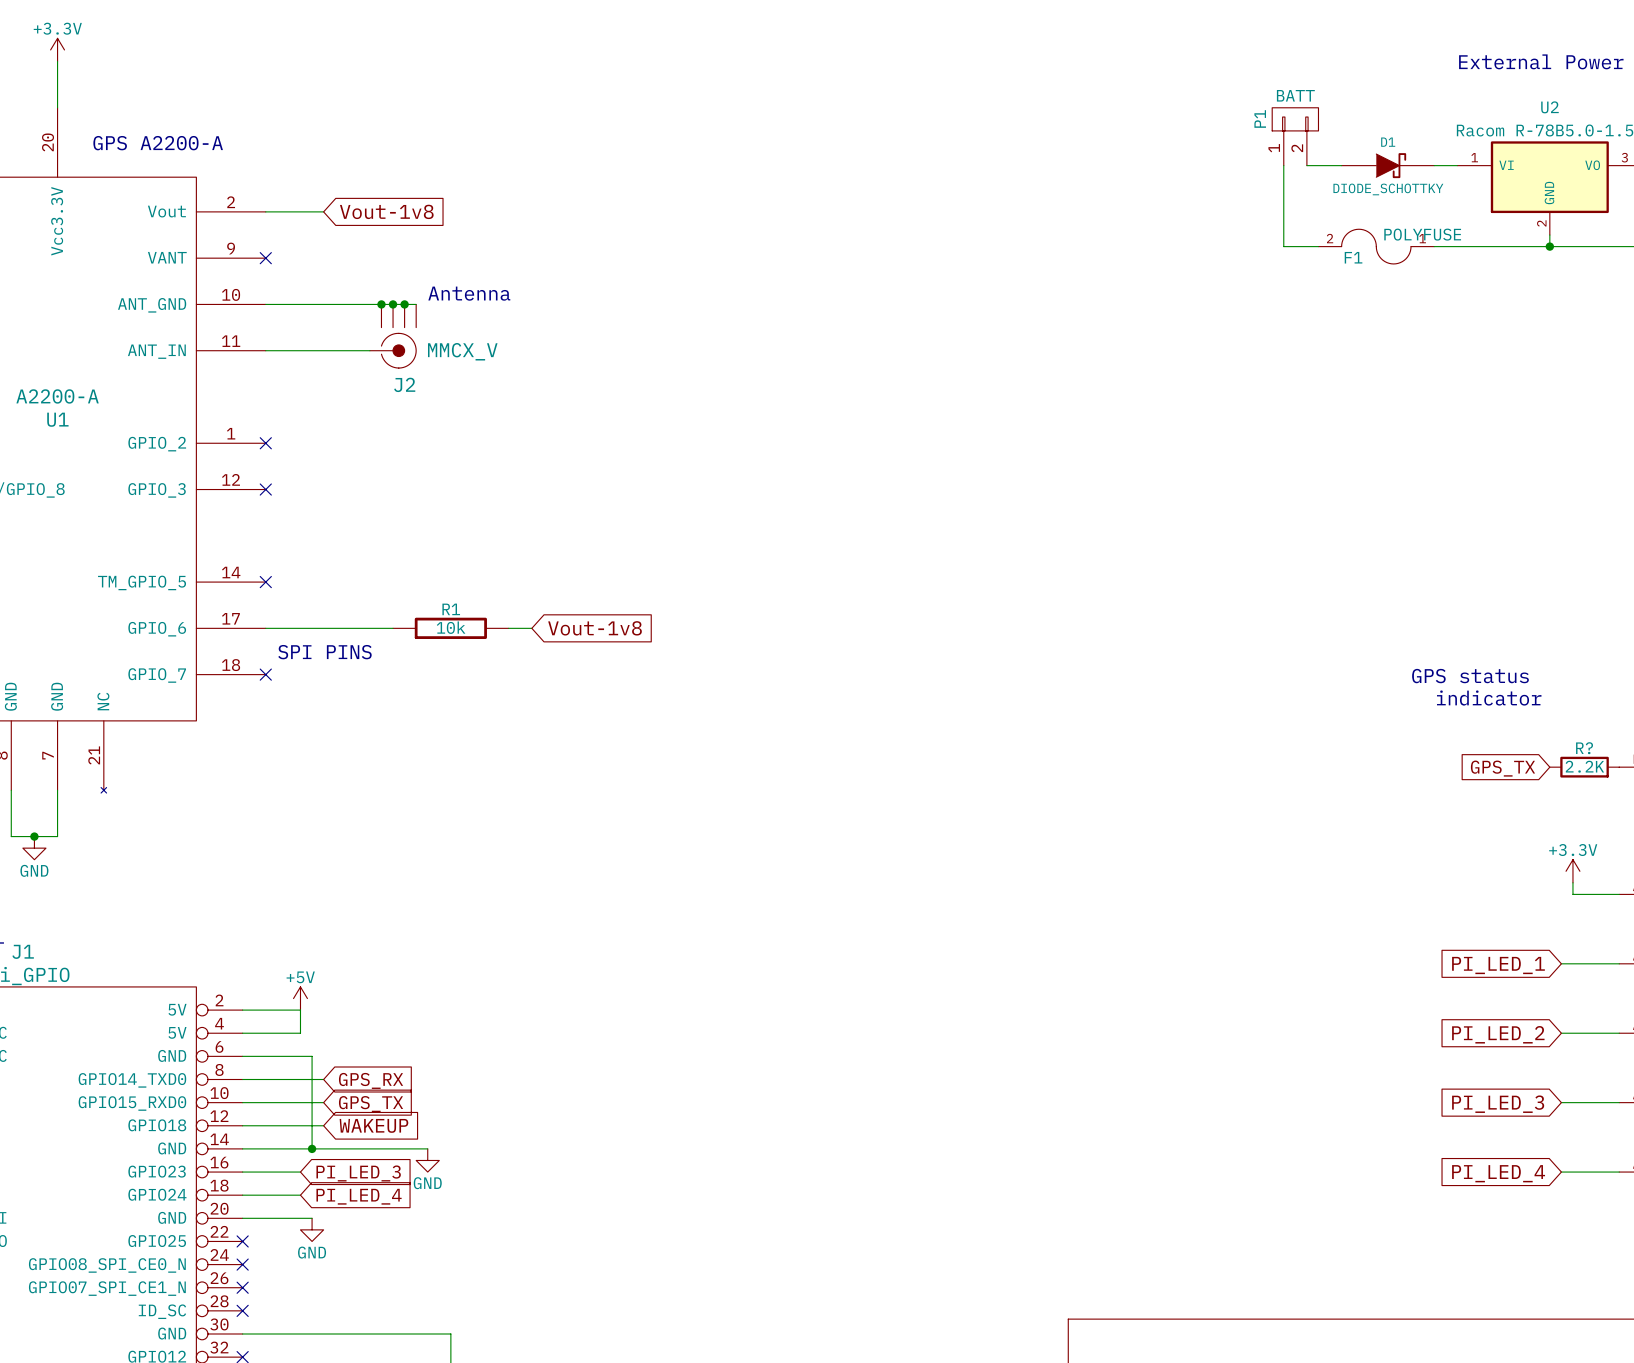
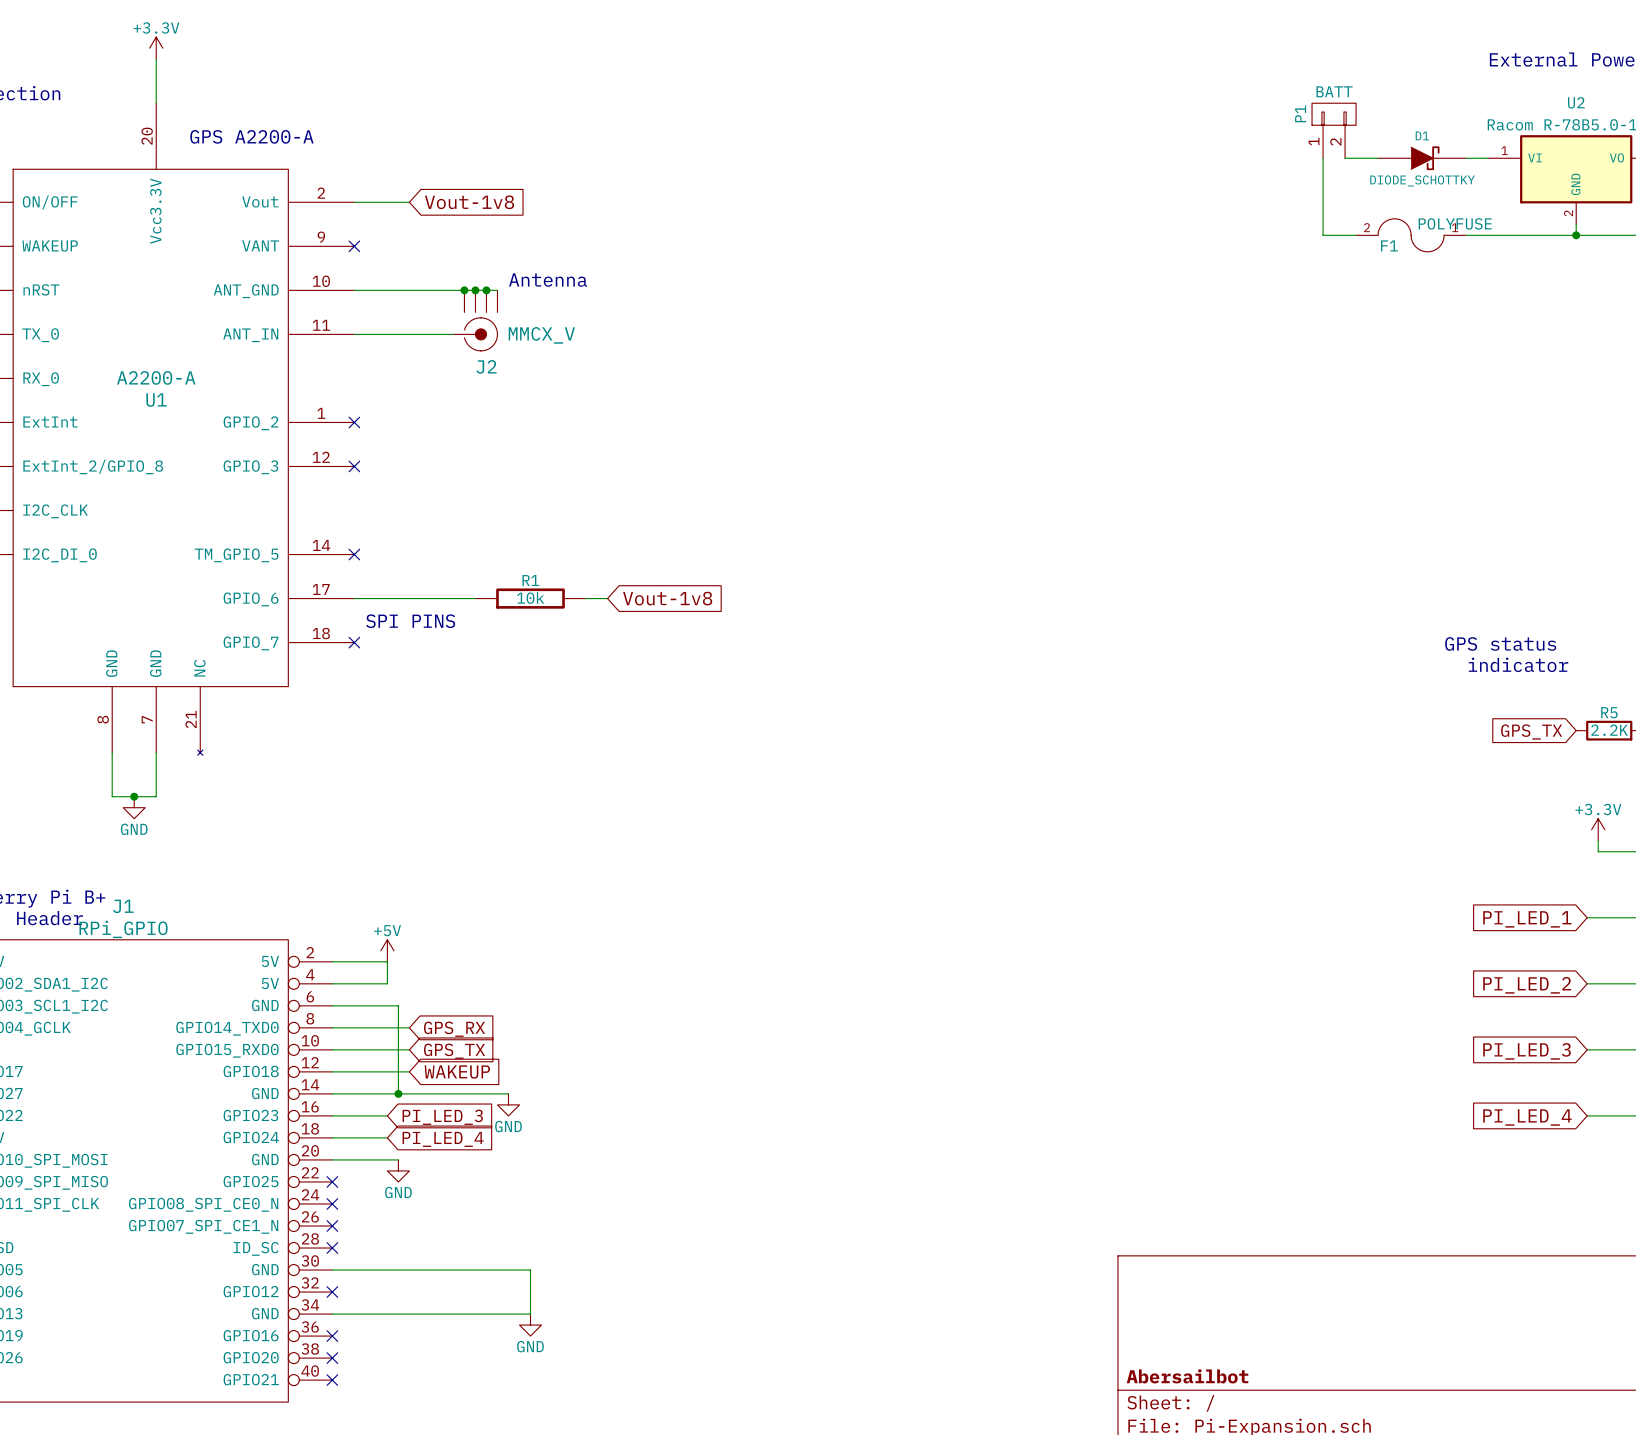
R? name: R? (1584, 748) -> R5 (1609, 712)

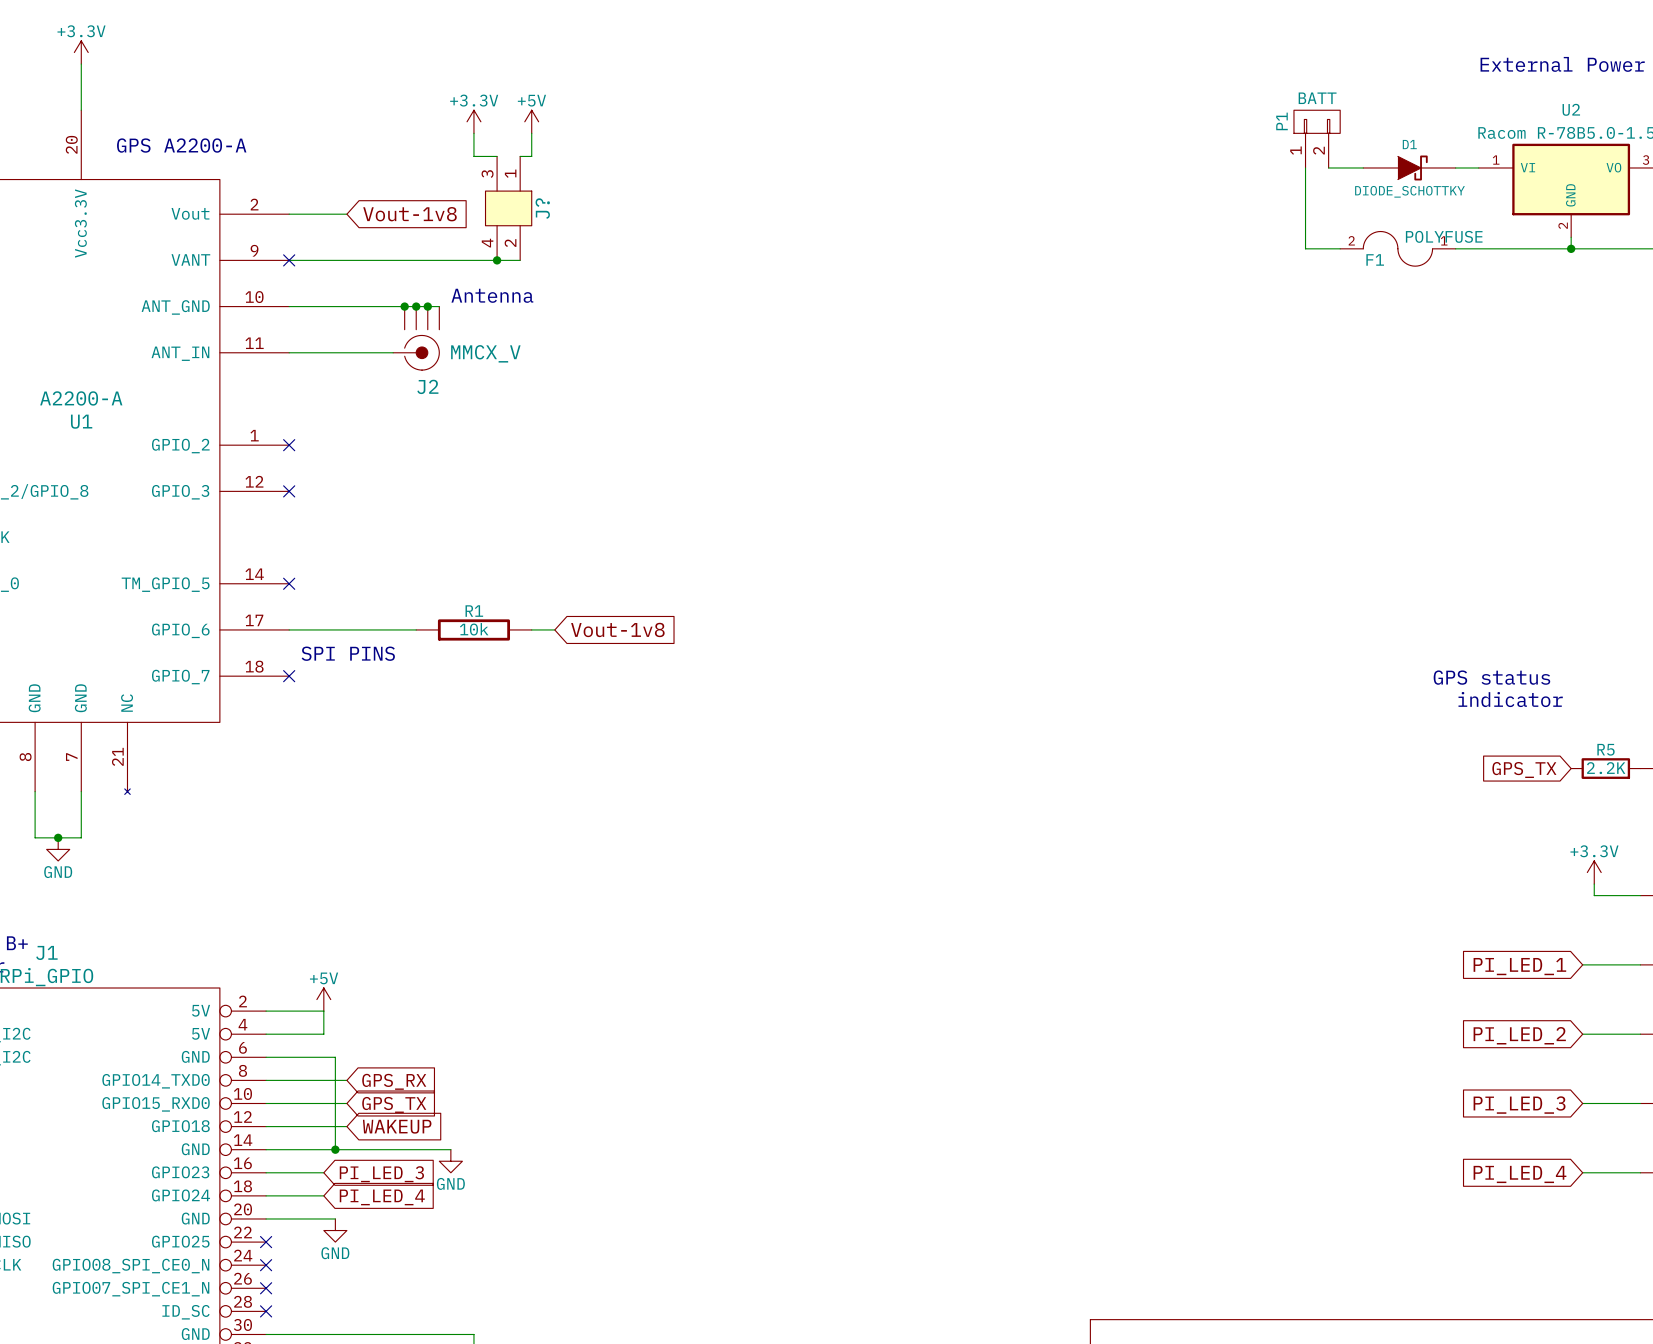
power symbol: none -> +3.3V (473, 121)
power symbol: none -> +5V (531, 121)
wire: none -> (473, 133) (473, 156) (497, 156)
wire: none -> (531, 133) (531, 156) (520, 156)
J?: none -> (508, 208)
wire: none -> (289, 260) (520, 260)
junction: none -> (497, 260)

